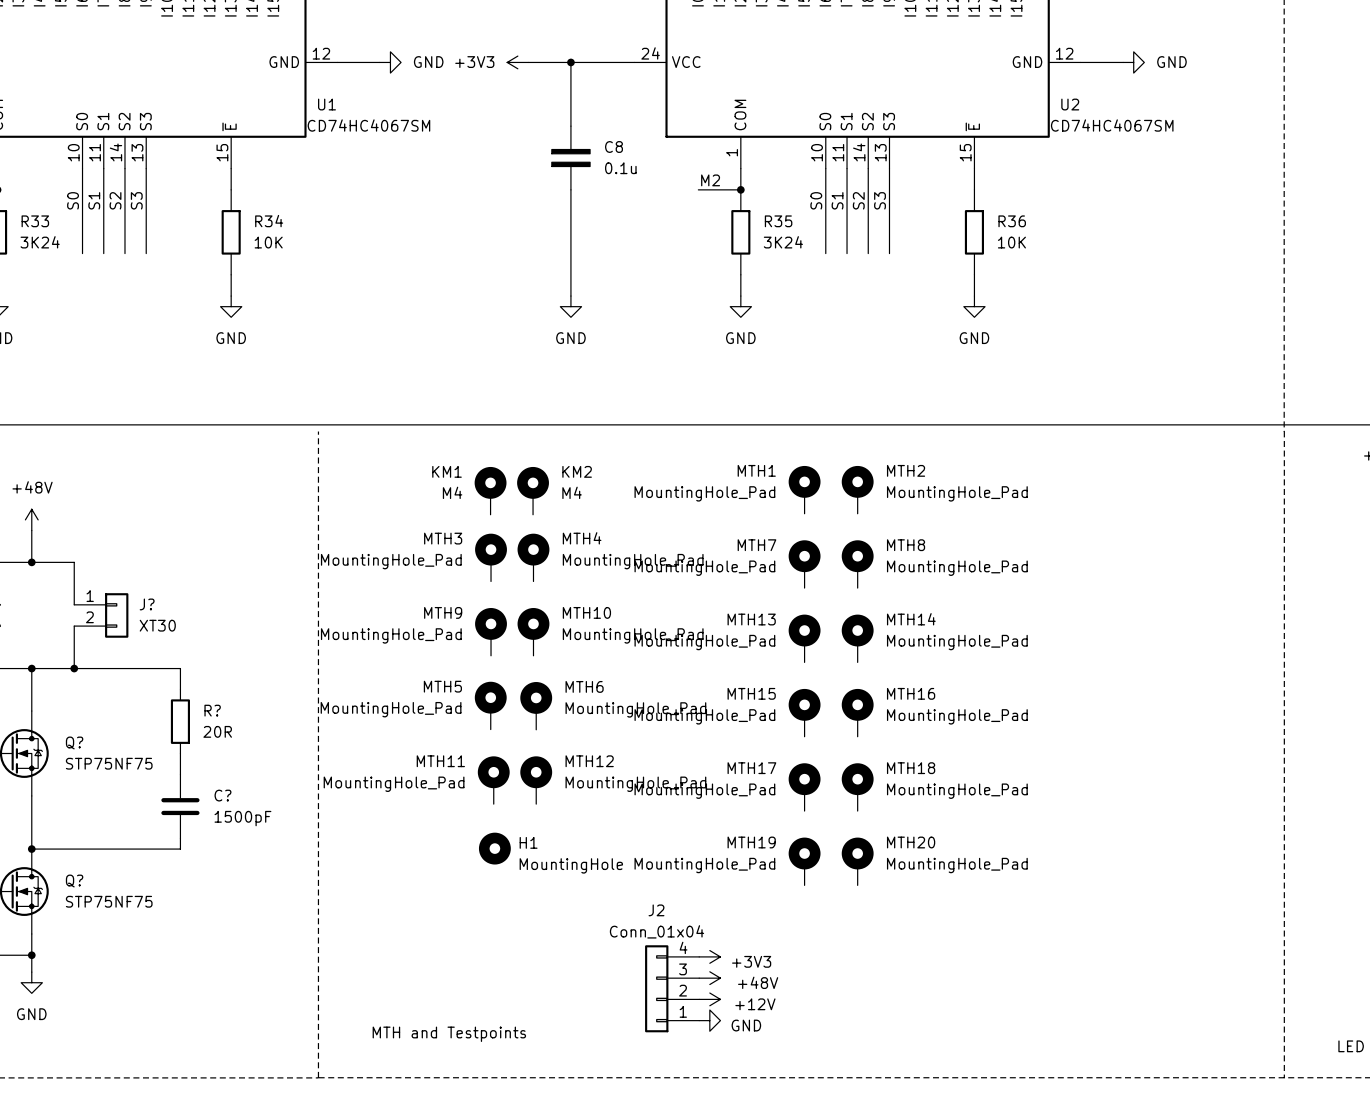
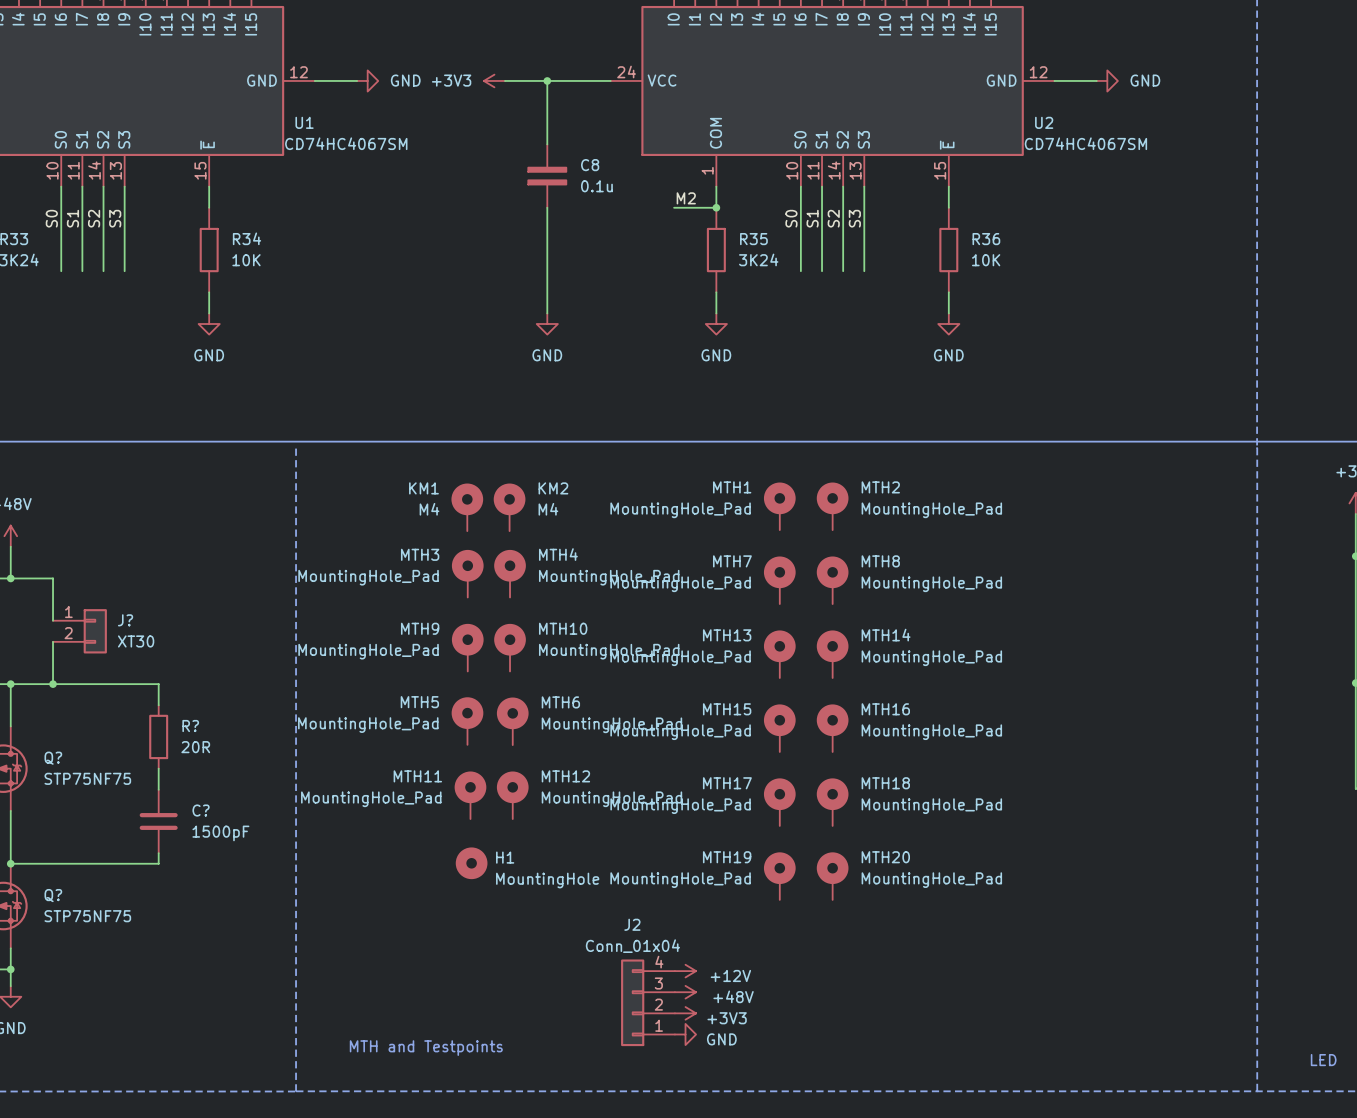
power symbol: +3V3 (709, 956) -> +12V (685, 971)
power symbol: +12V (709, 999) -> +3V3 (685, 1013)

